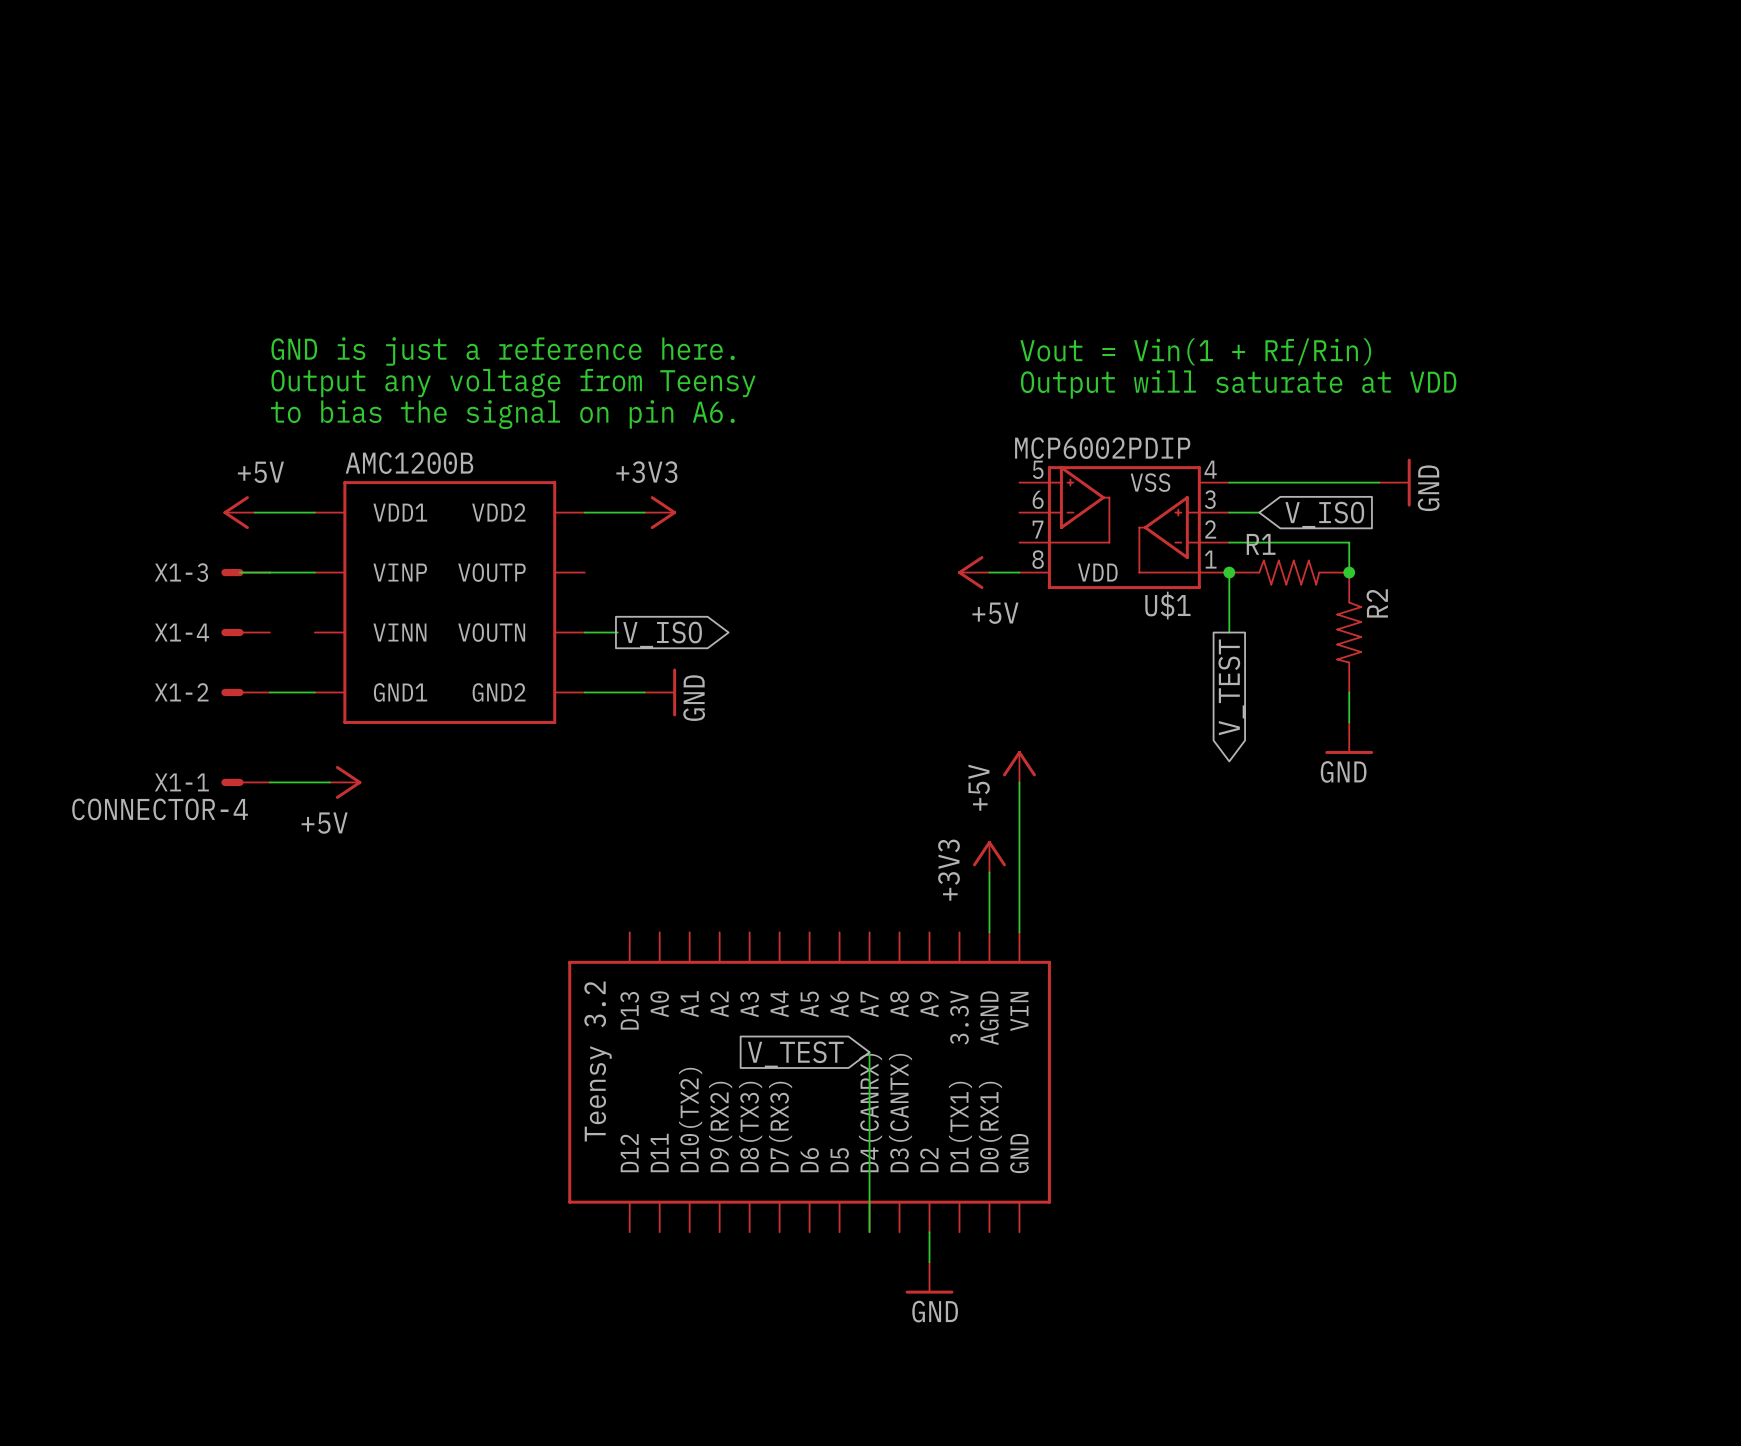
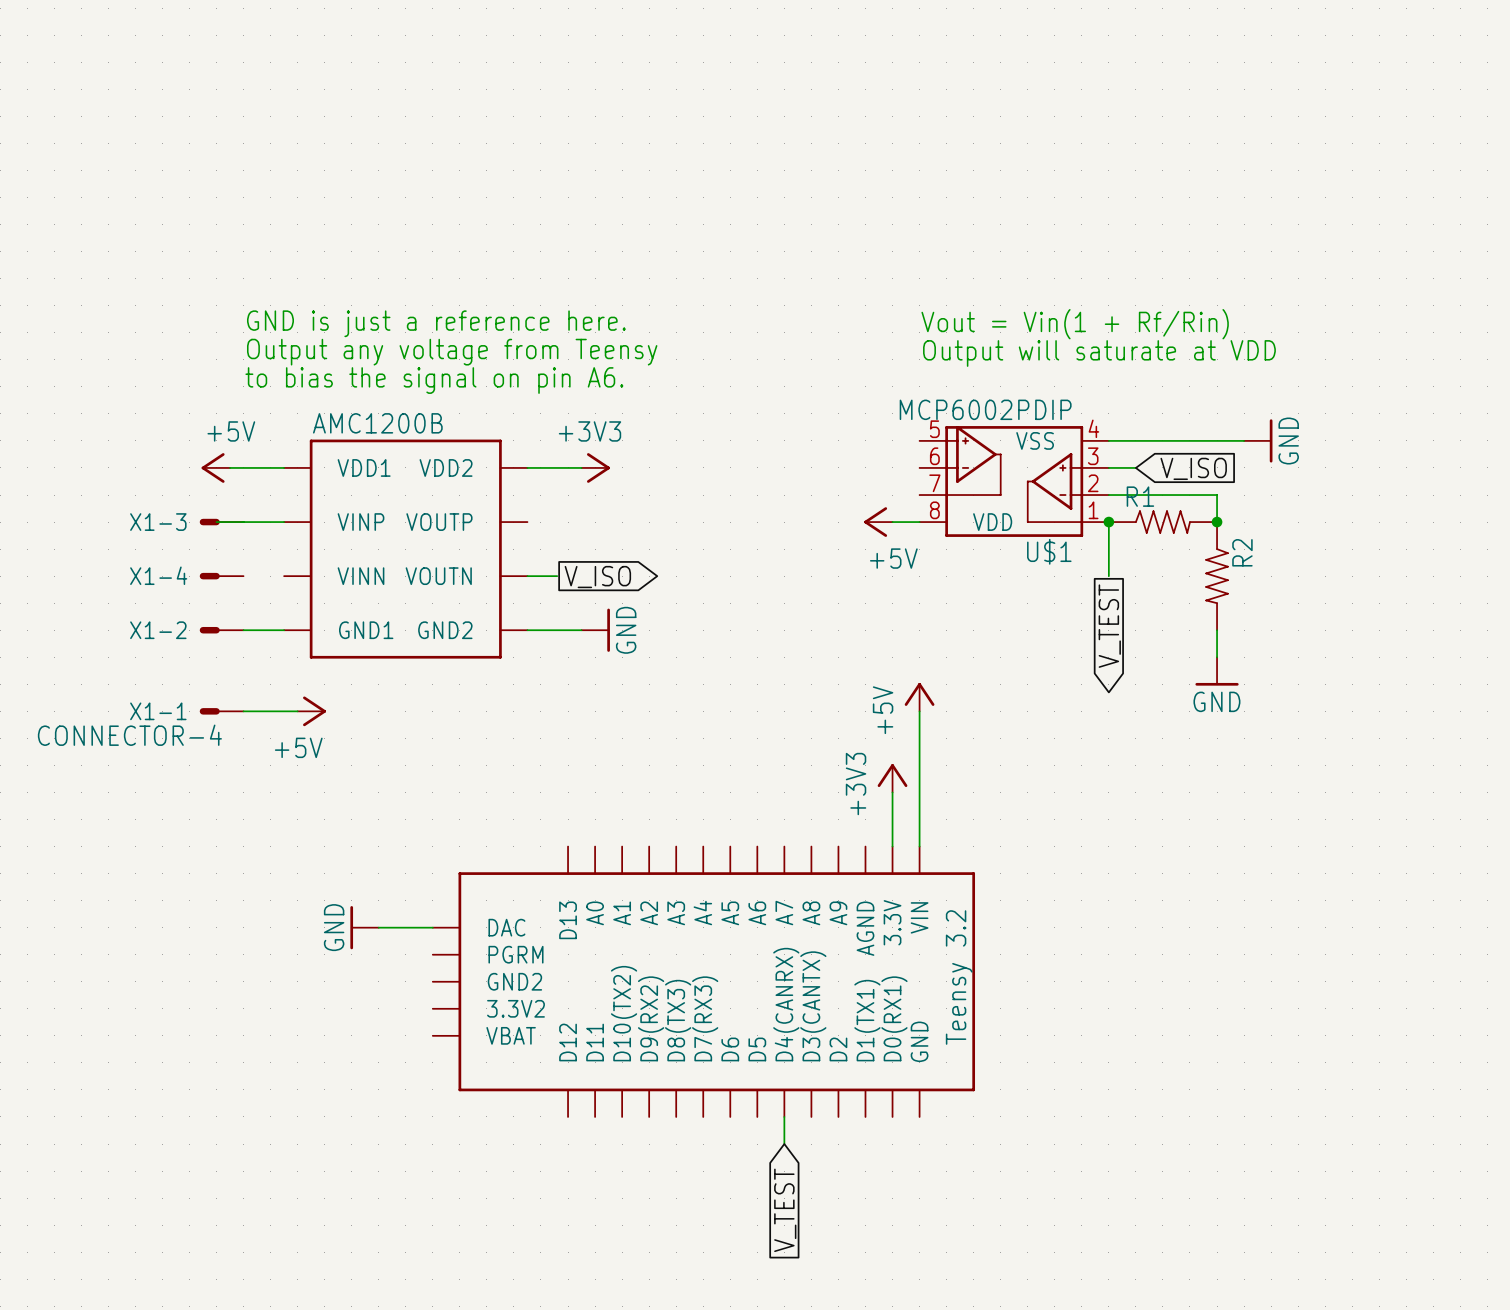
power symbol: none -> GND (364, 927)
wire: none -> (378, 927) (432, 927)
wire: (869, 1052) (869, 1232) -> (784, 1144) (784, 1116)
global label rotation: 0° (795, 1054) -> 90° counterclockwise (785, 1210)
global label position: V_TEST (795, 1054) -> V_TEST (785, 1210)
part: none -> (703, 981)
part: (809, 1082) -> none
wire: (929, 1232) (929, 1262) -> none
power symbol: GND (929, 1277) -> none

